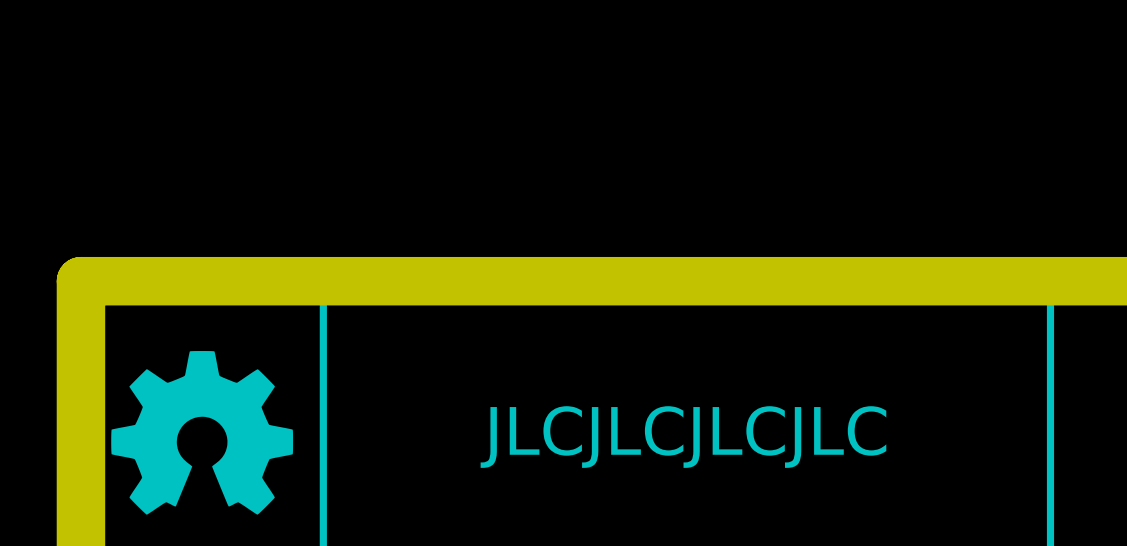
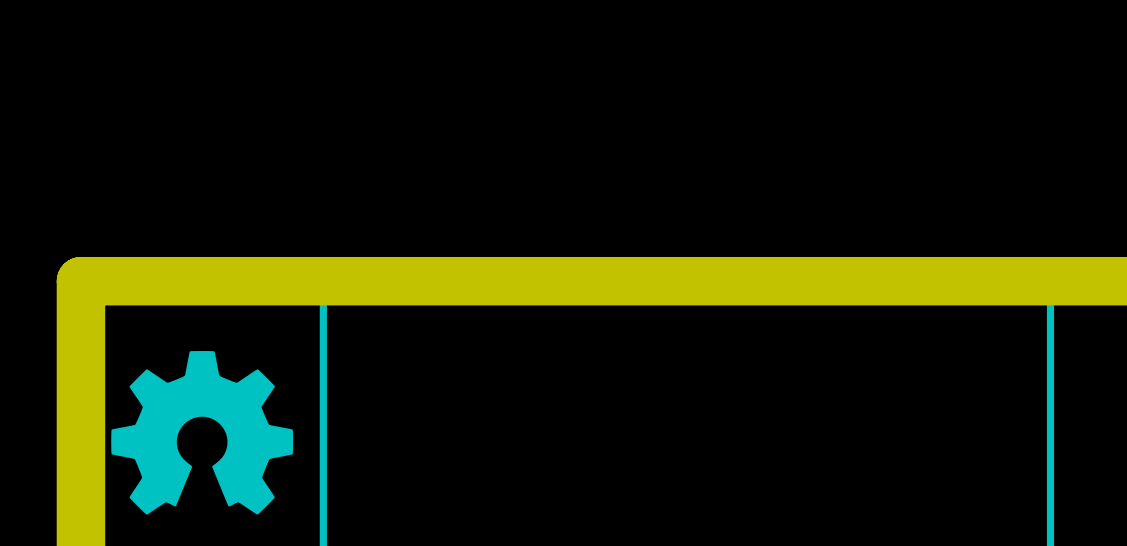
text: JLCJLCJLCJLC (683, 437) -> none

